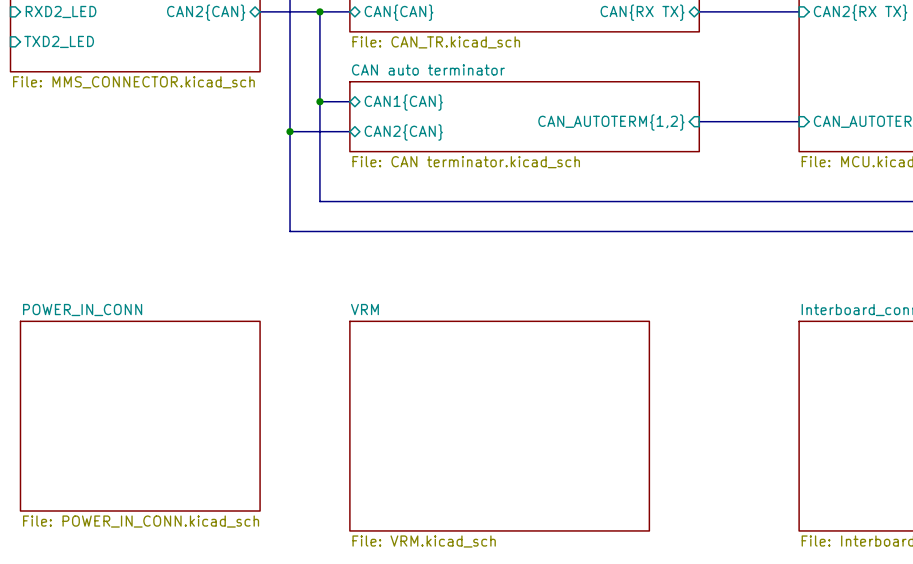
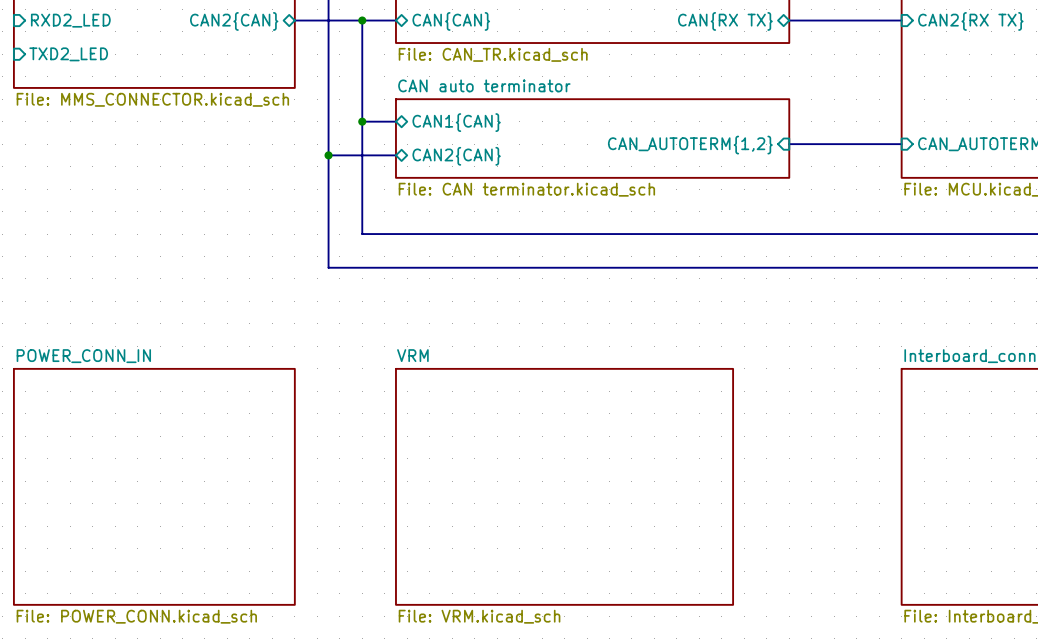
sheet POWER_IN_CONN: File: POWER_IN_CONN.kicad_sch (140, 416) -> none
sheet POWER_CONN_IN: none -> File: POWER_CONN.kicad_sch (154, 486)

